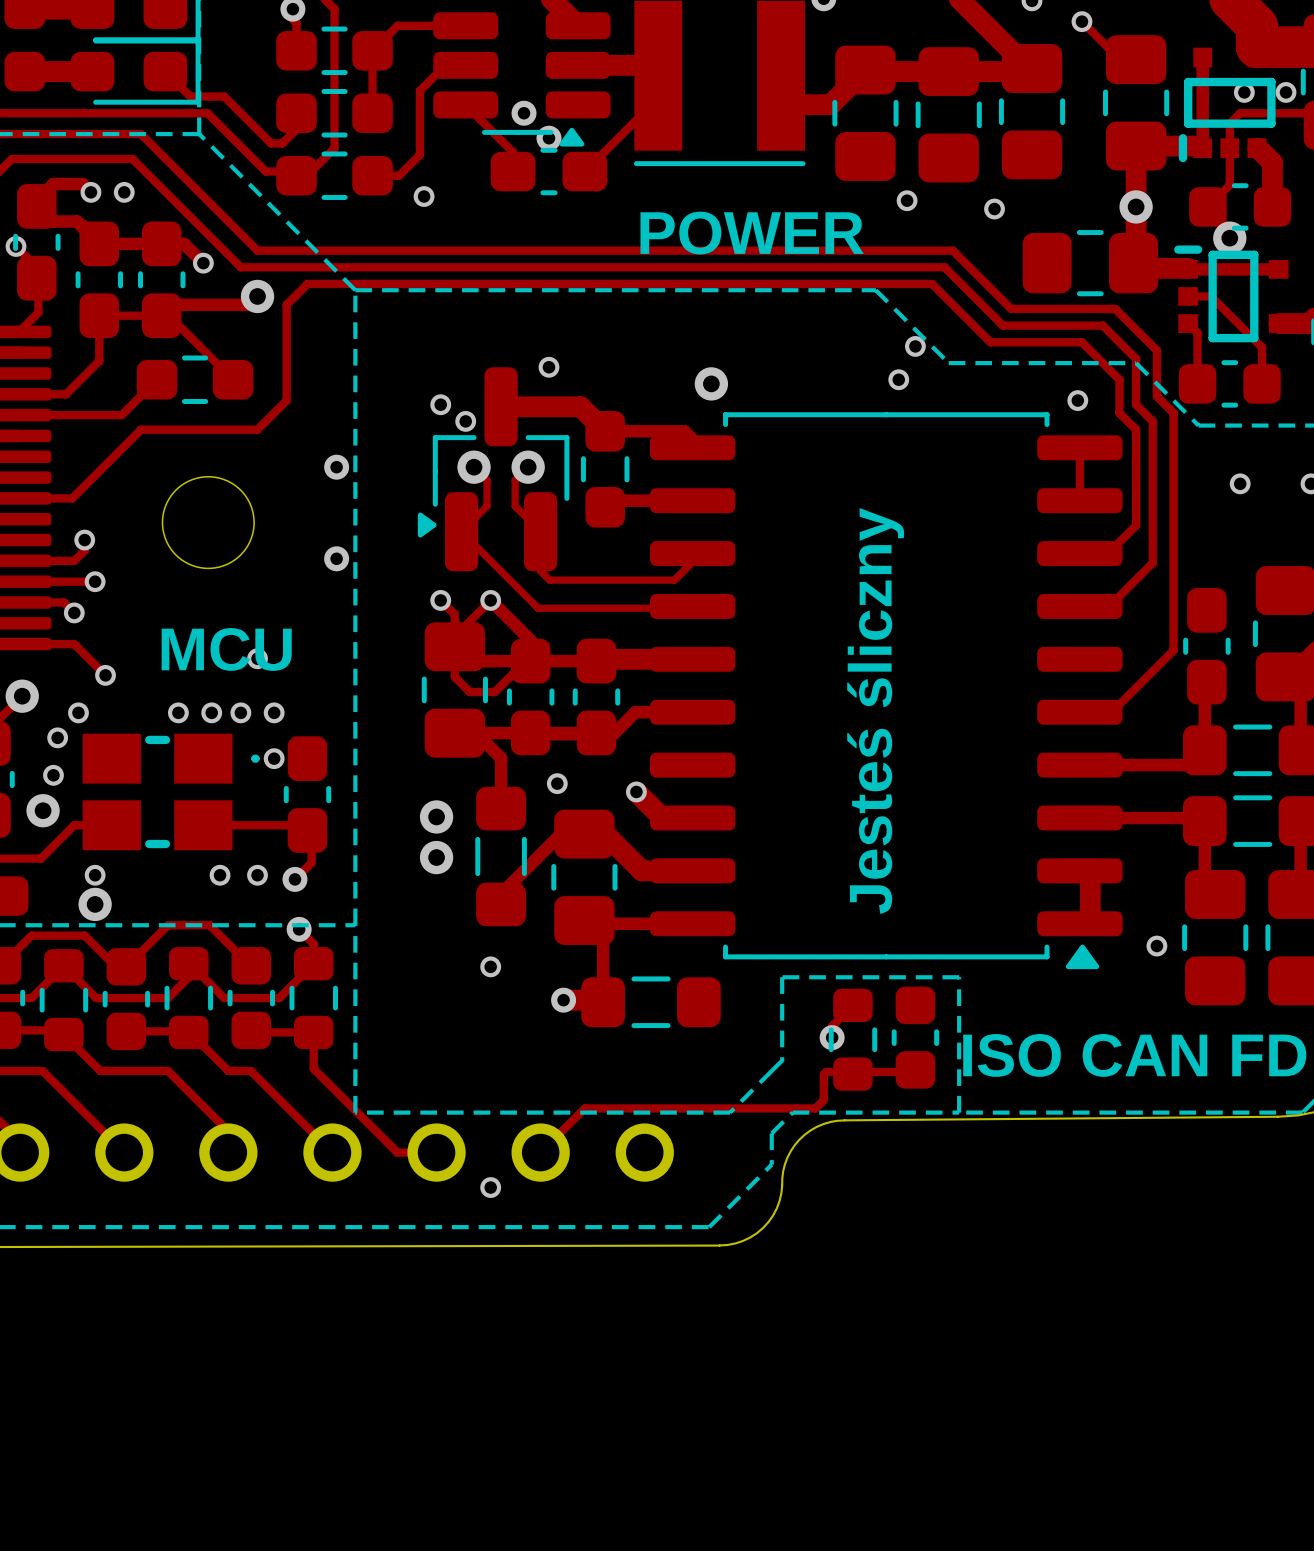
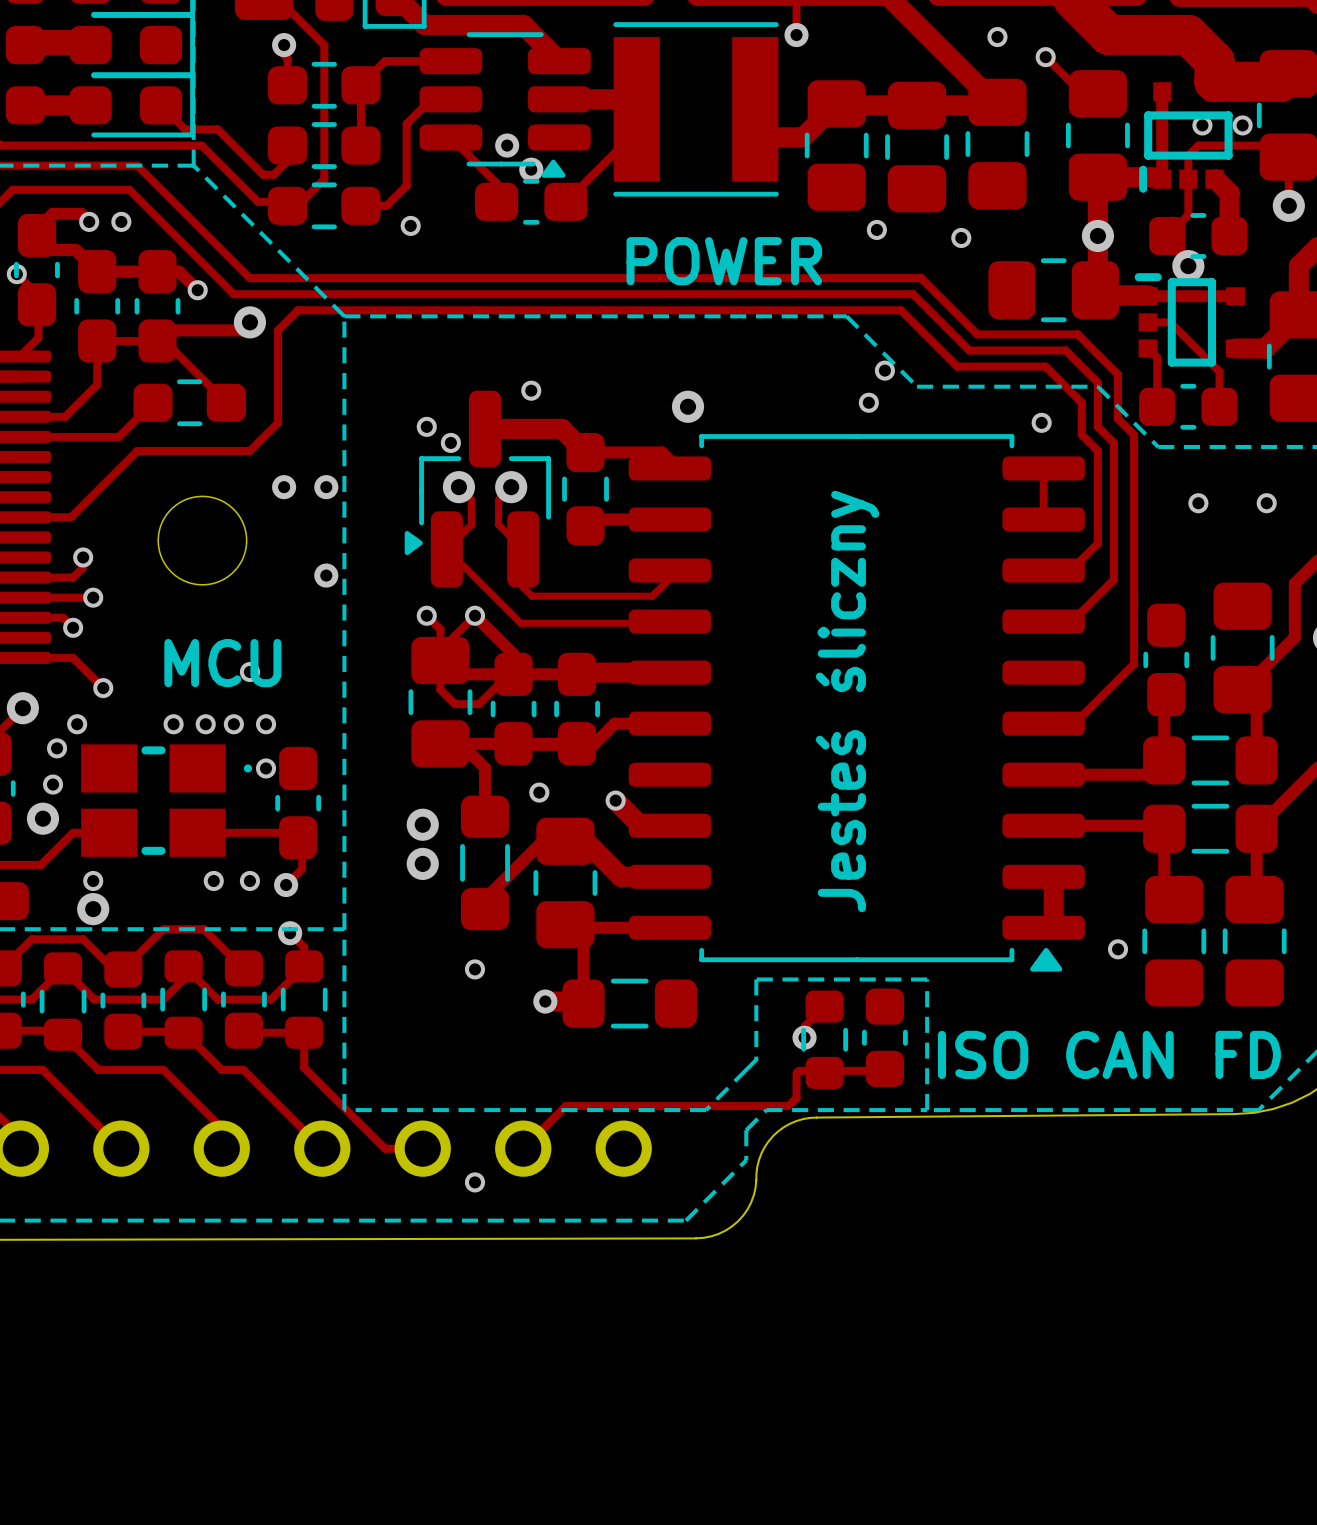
via: none -> (284, 487)

